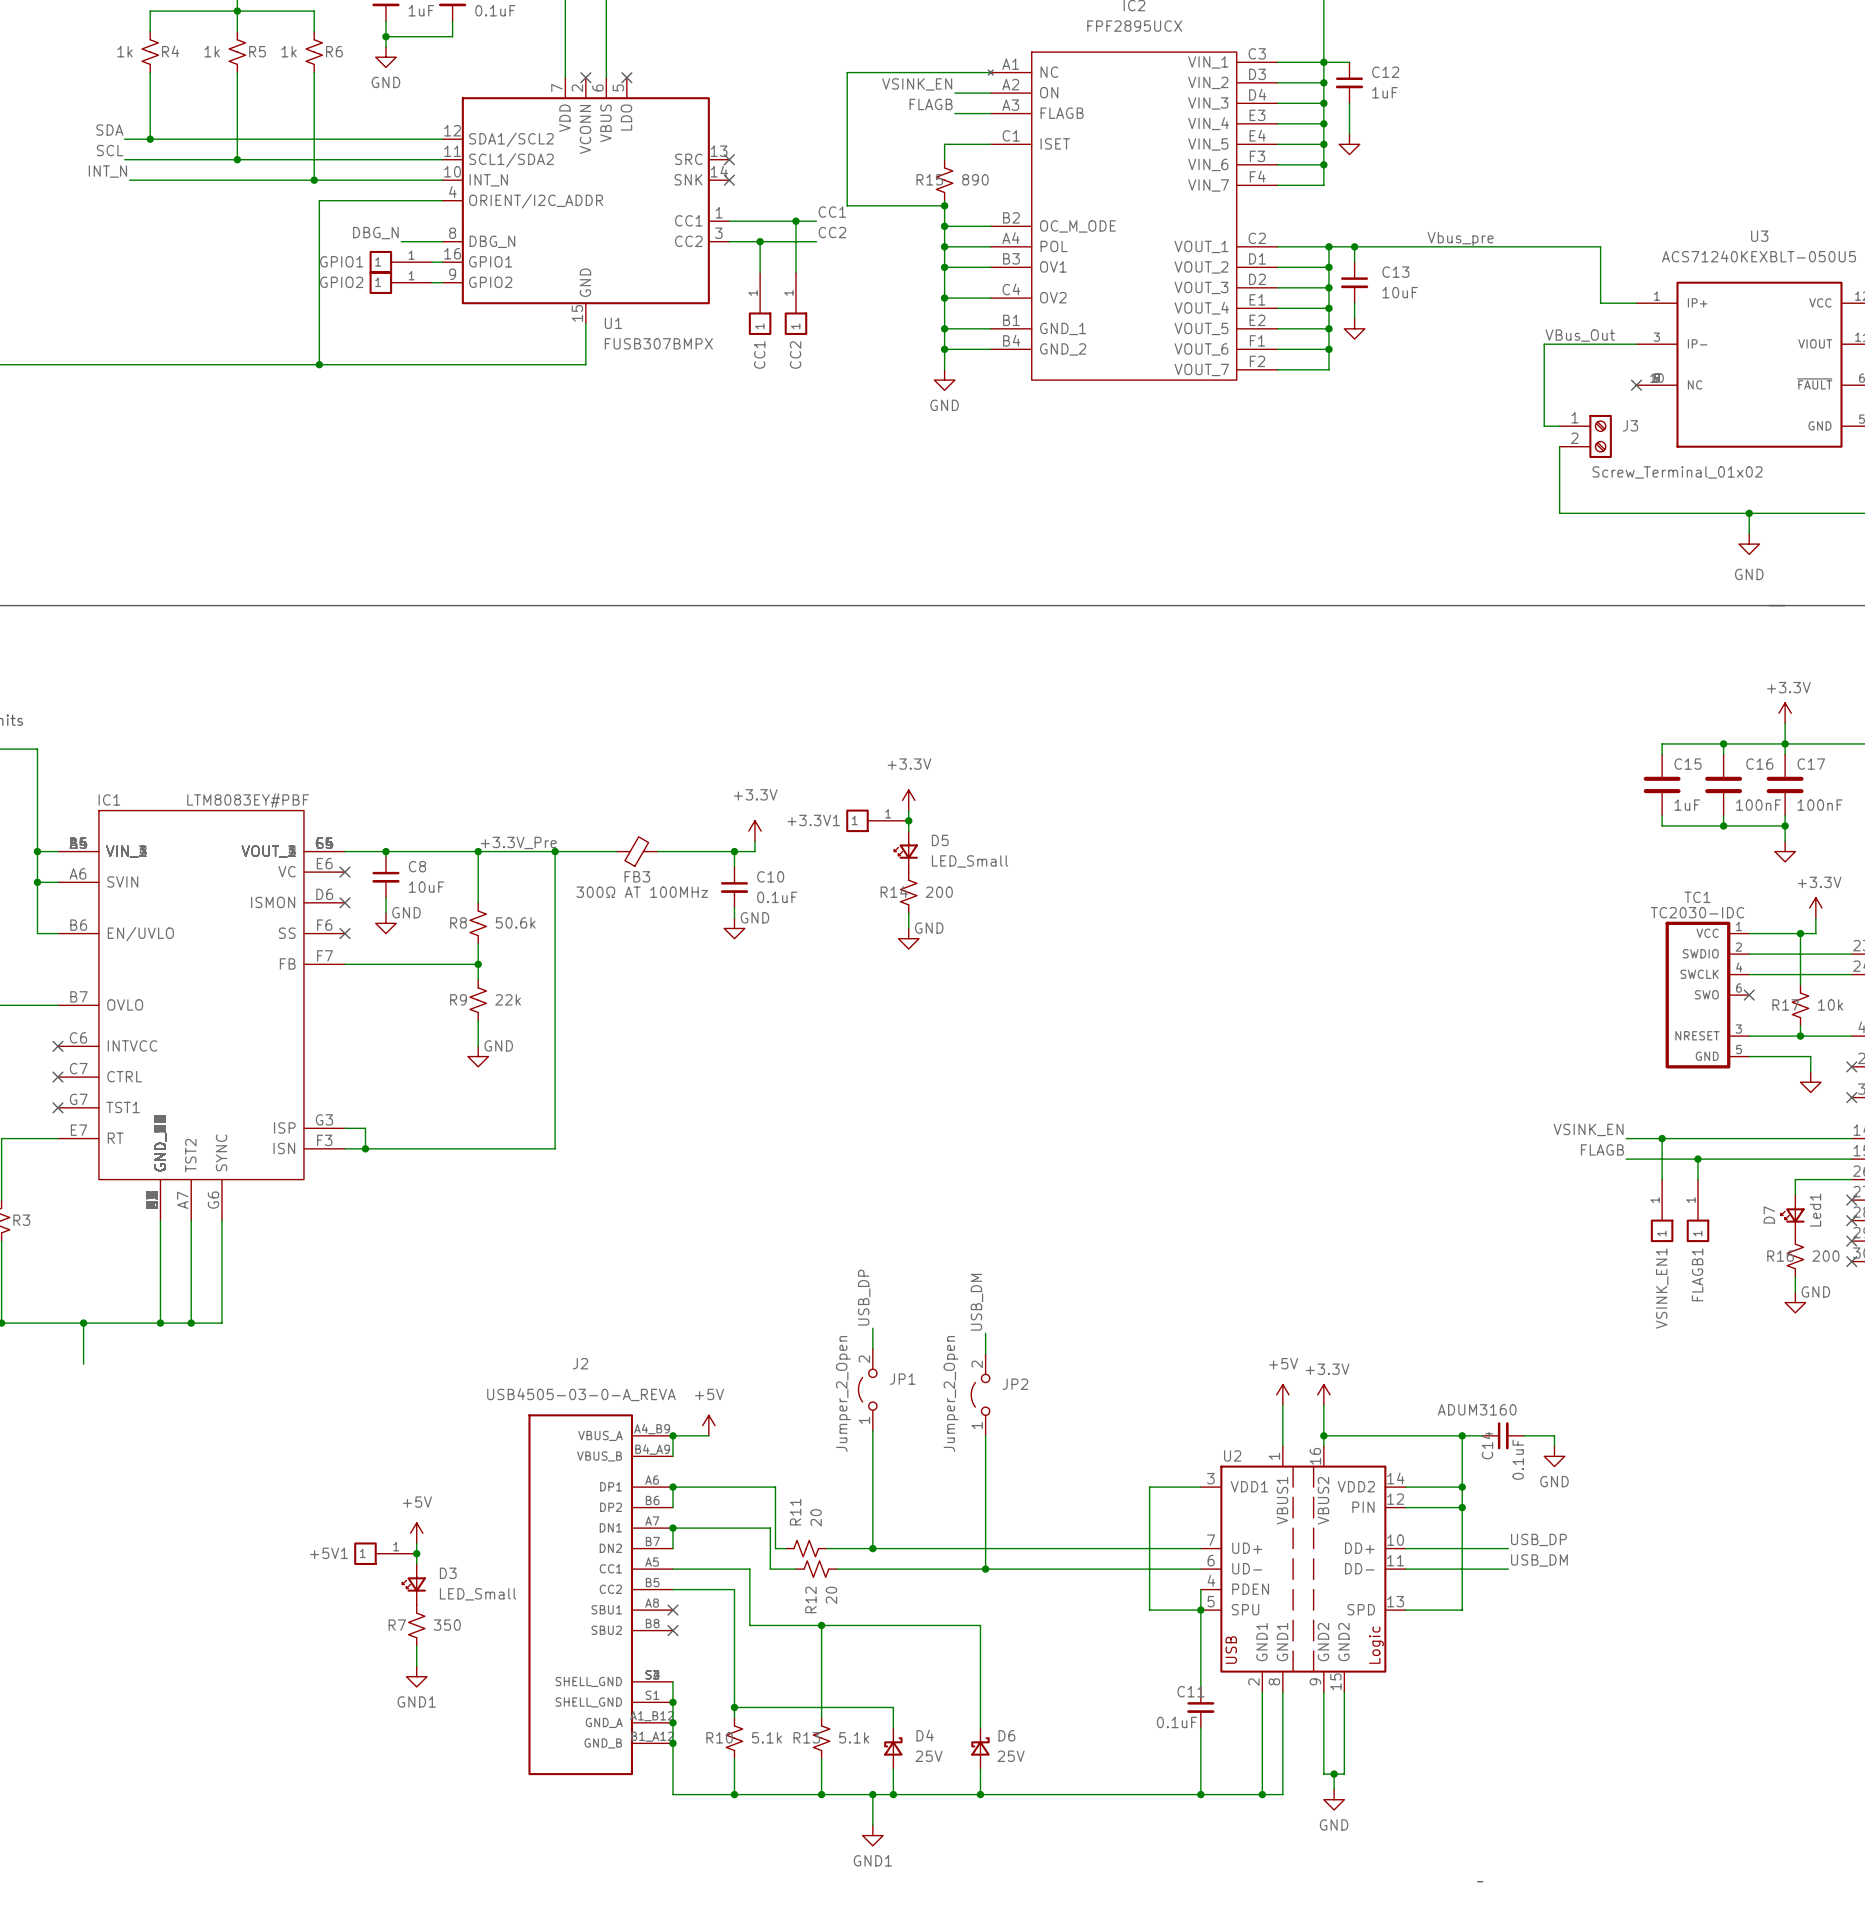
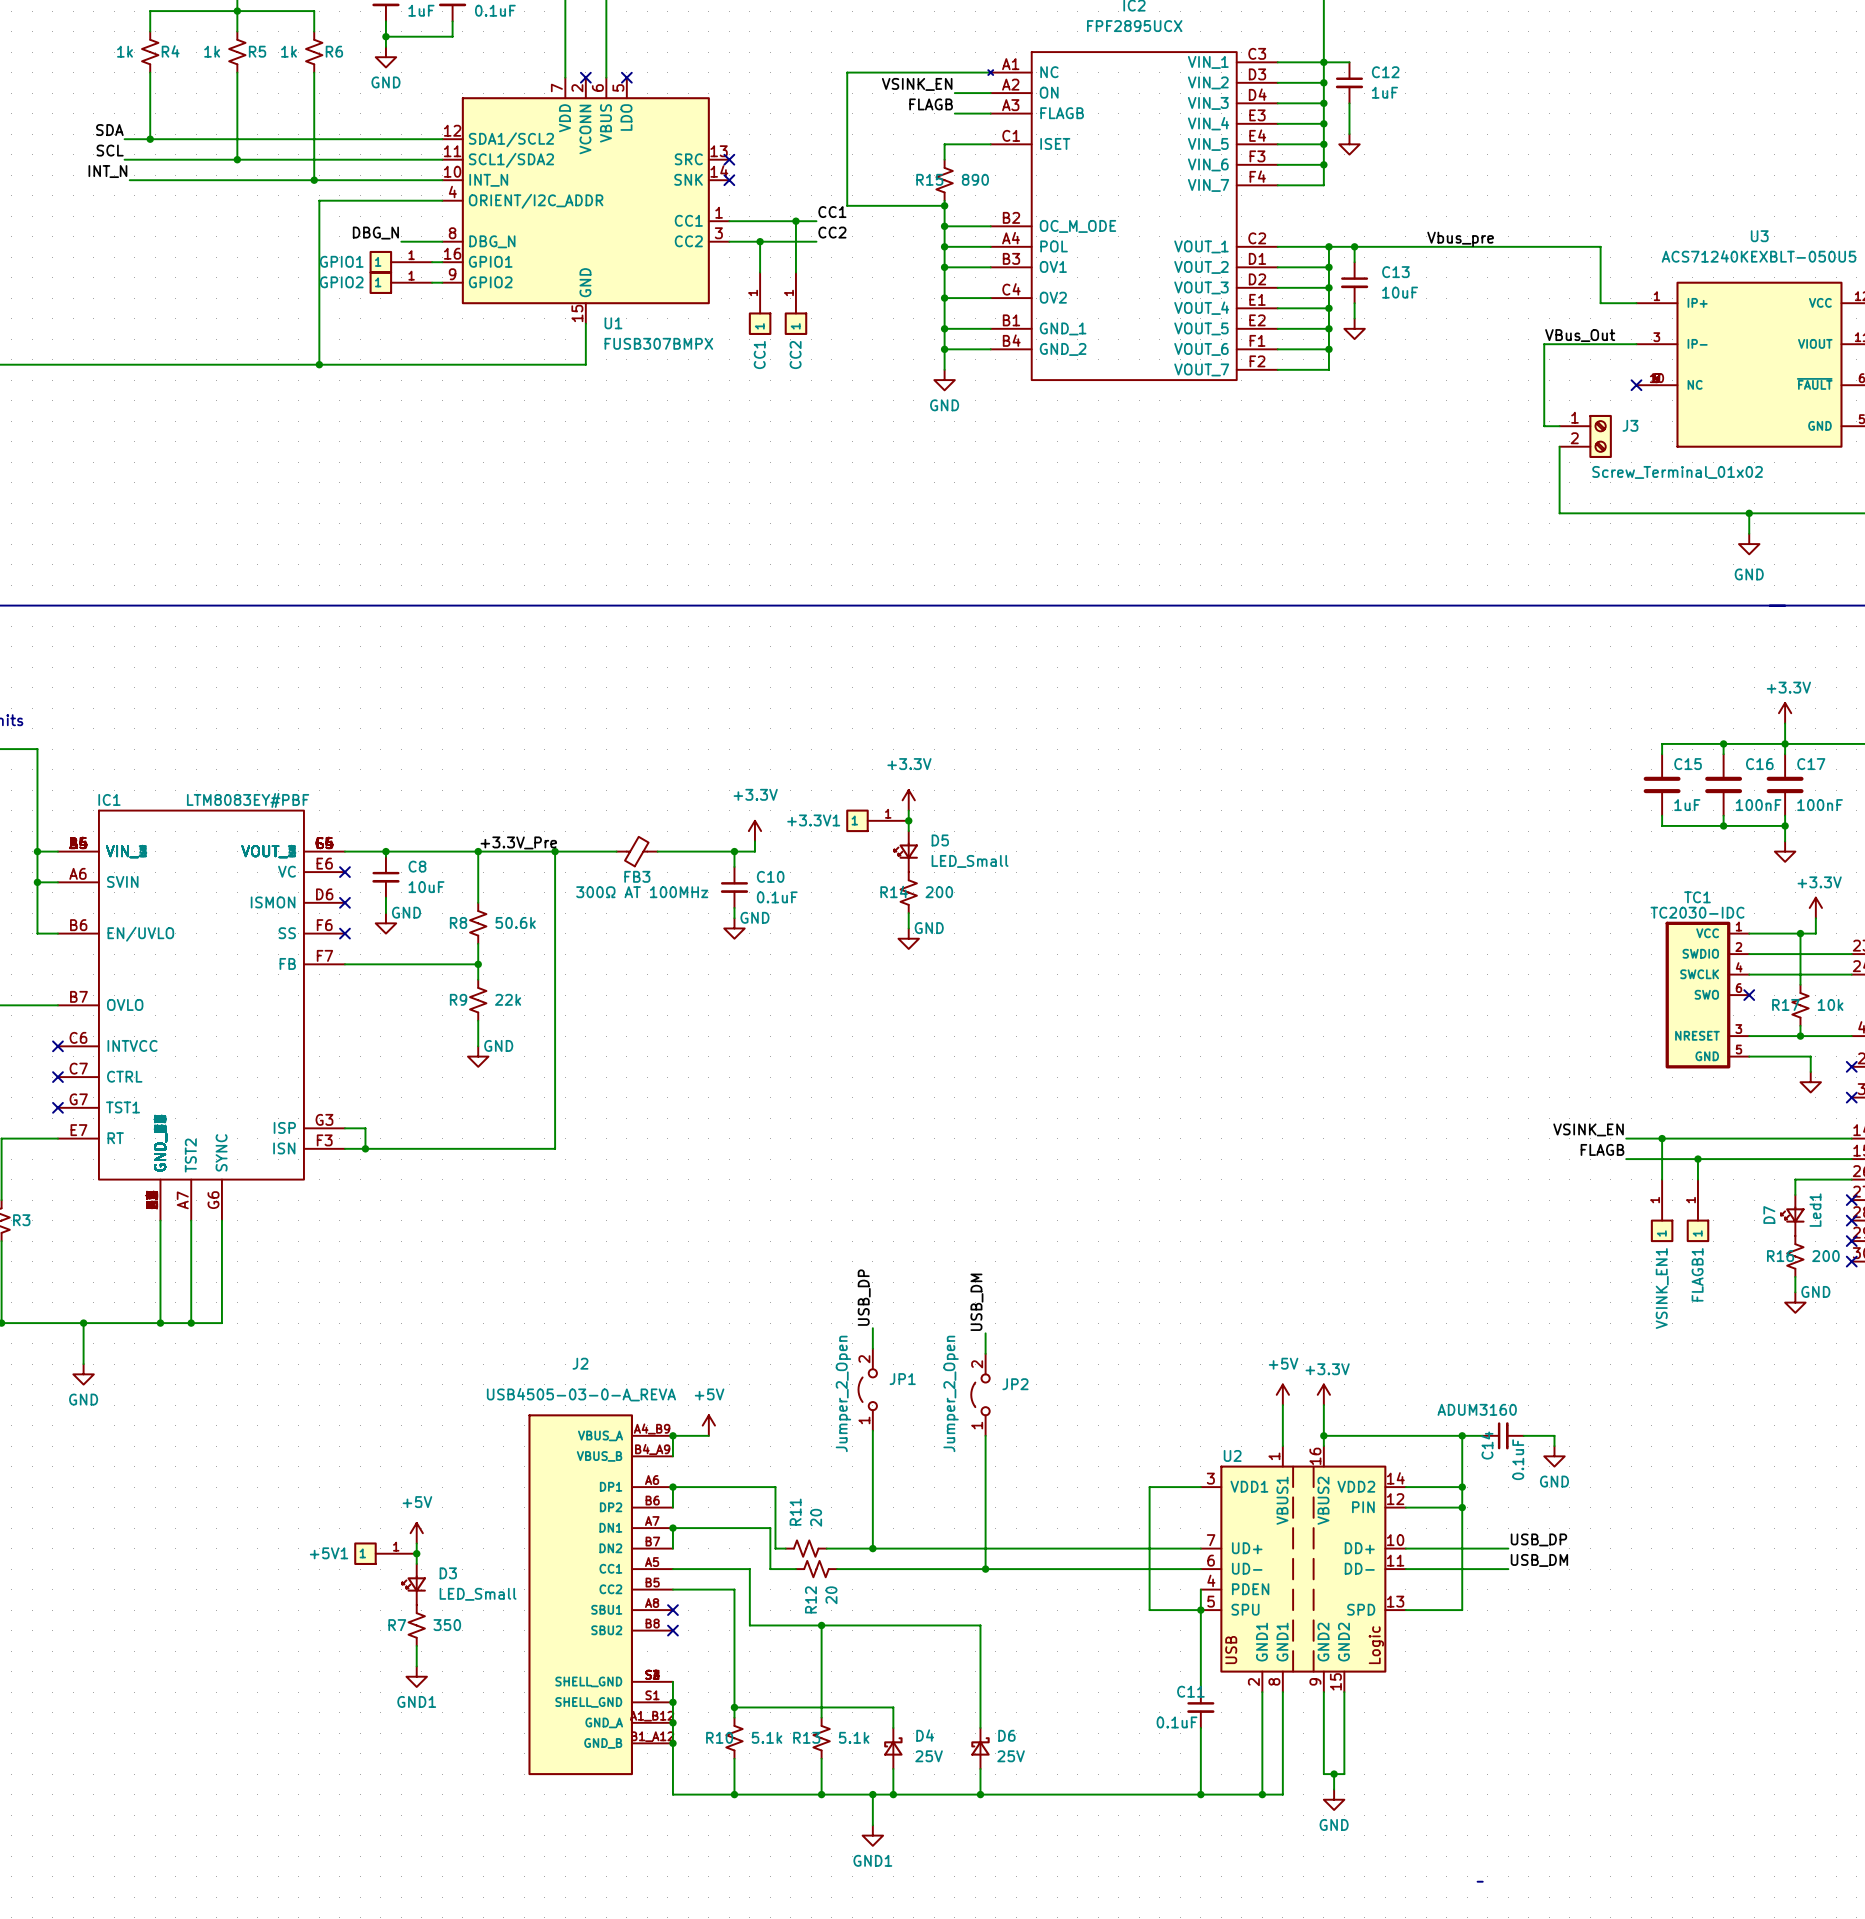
power symbol: none -> GND (83, 1374)

